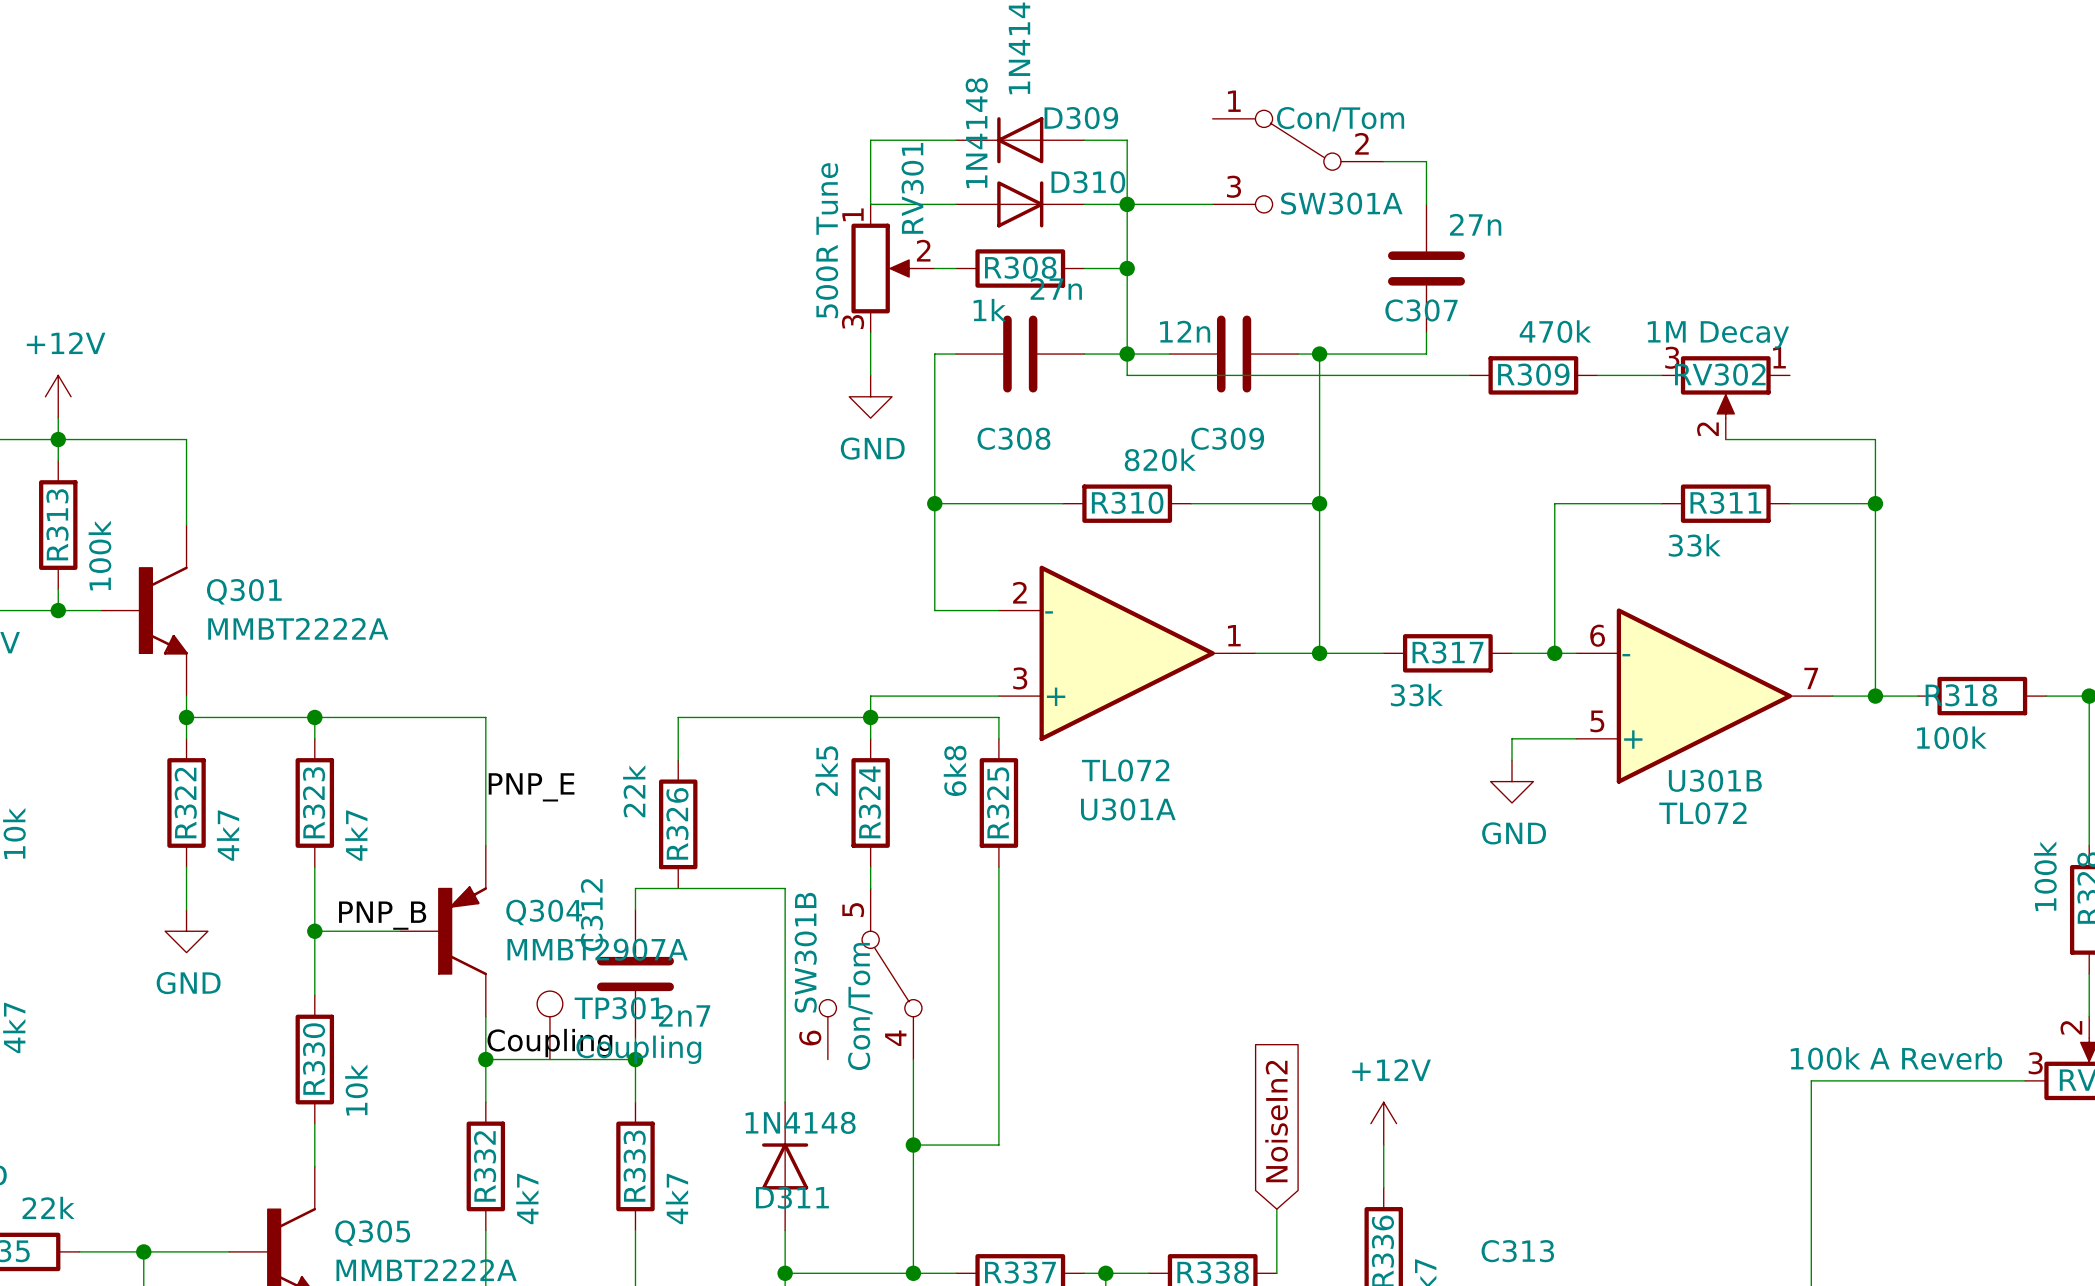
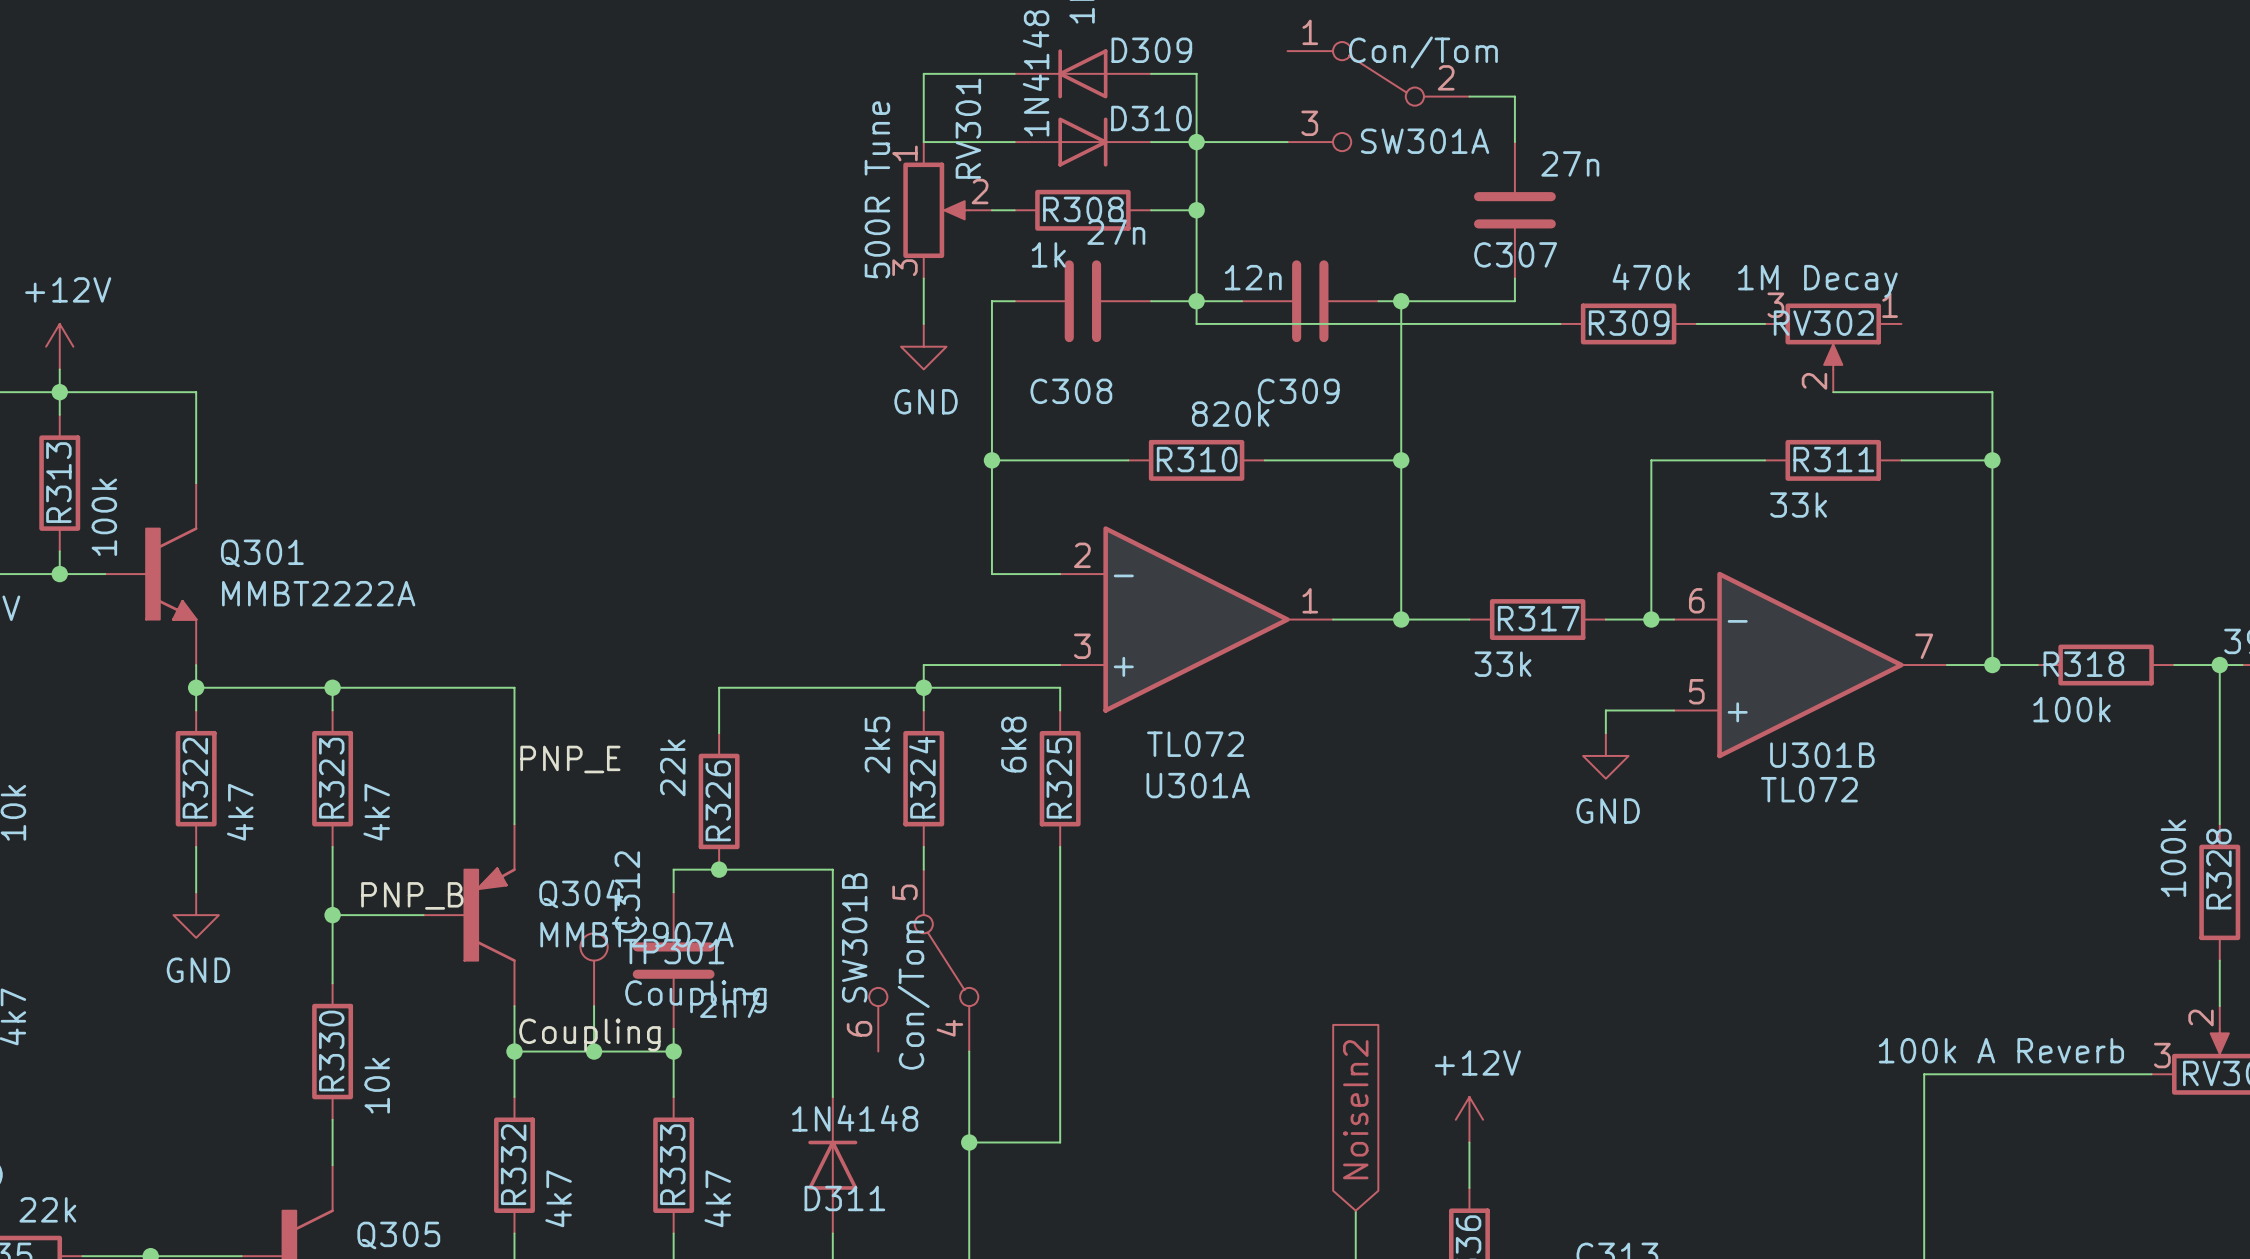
junction: none -> (719, 869)
wire: none -> (594, 1006) (594, 1051)
TP301 position: (549, 1025) -> (594, 969)
junction: none -> (594, 1051)

